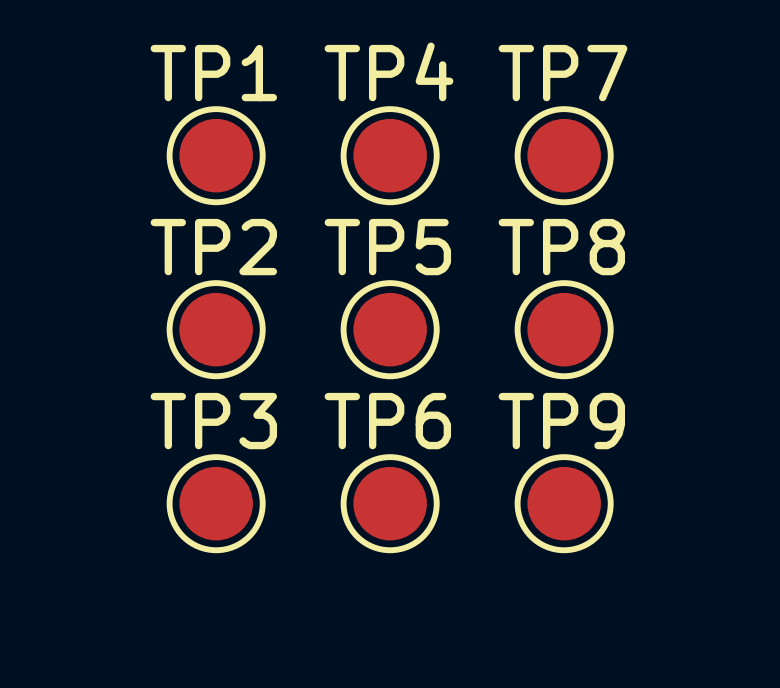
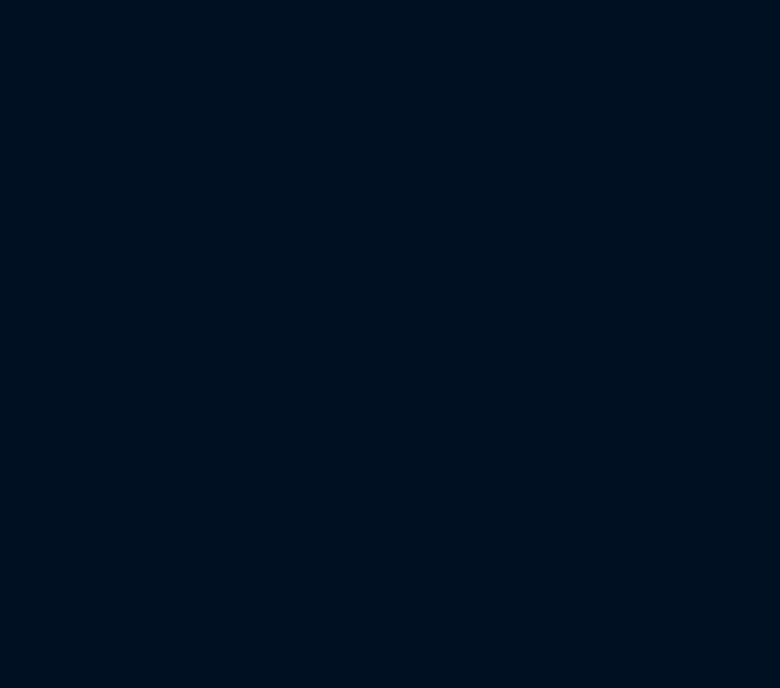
TP1: (216, 155) -> none
TP4: (390, 155) -> none
TP7: (564, 155) -> none
TP2: (216, 329) -> none
TP5: (390, 329) -> none
TP8: (564, 329) -> none
TP3: (216, 503) -> none
TP6: (390, 503) -> none
TP9: (564, 503) -> none

